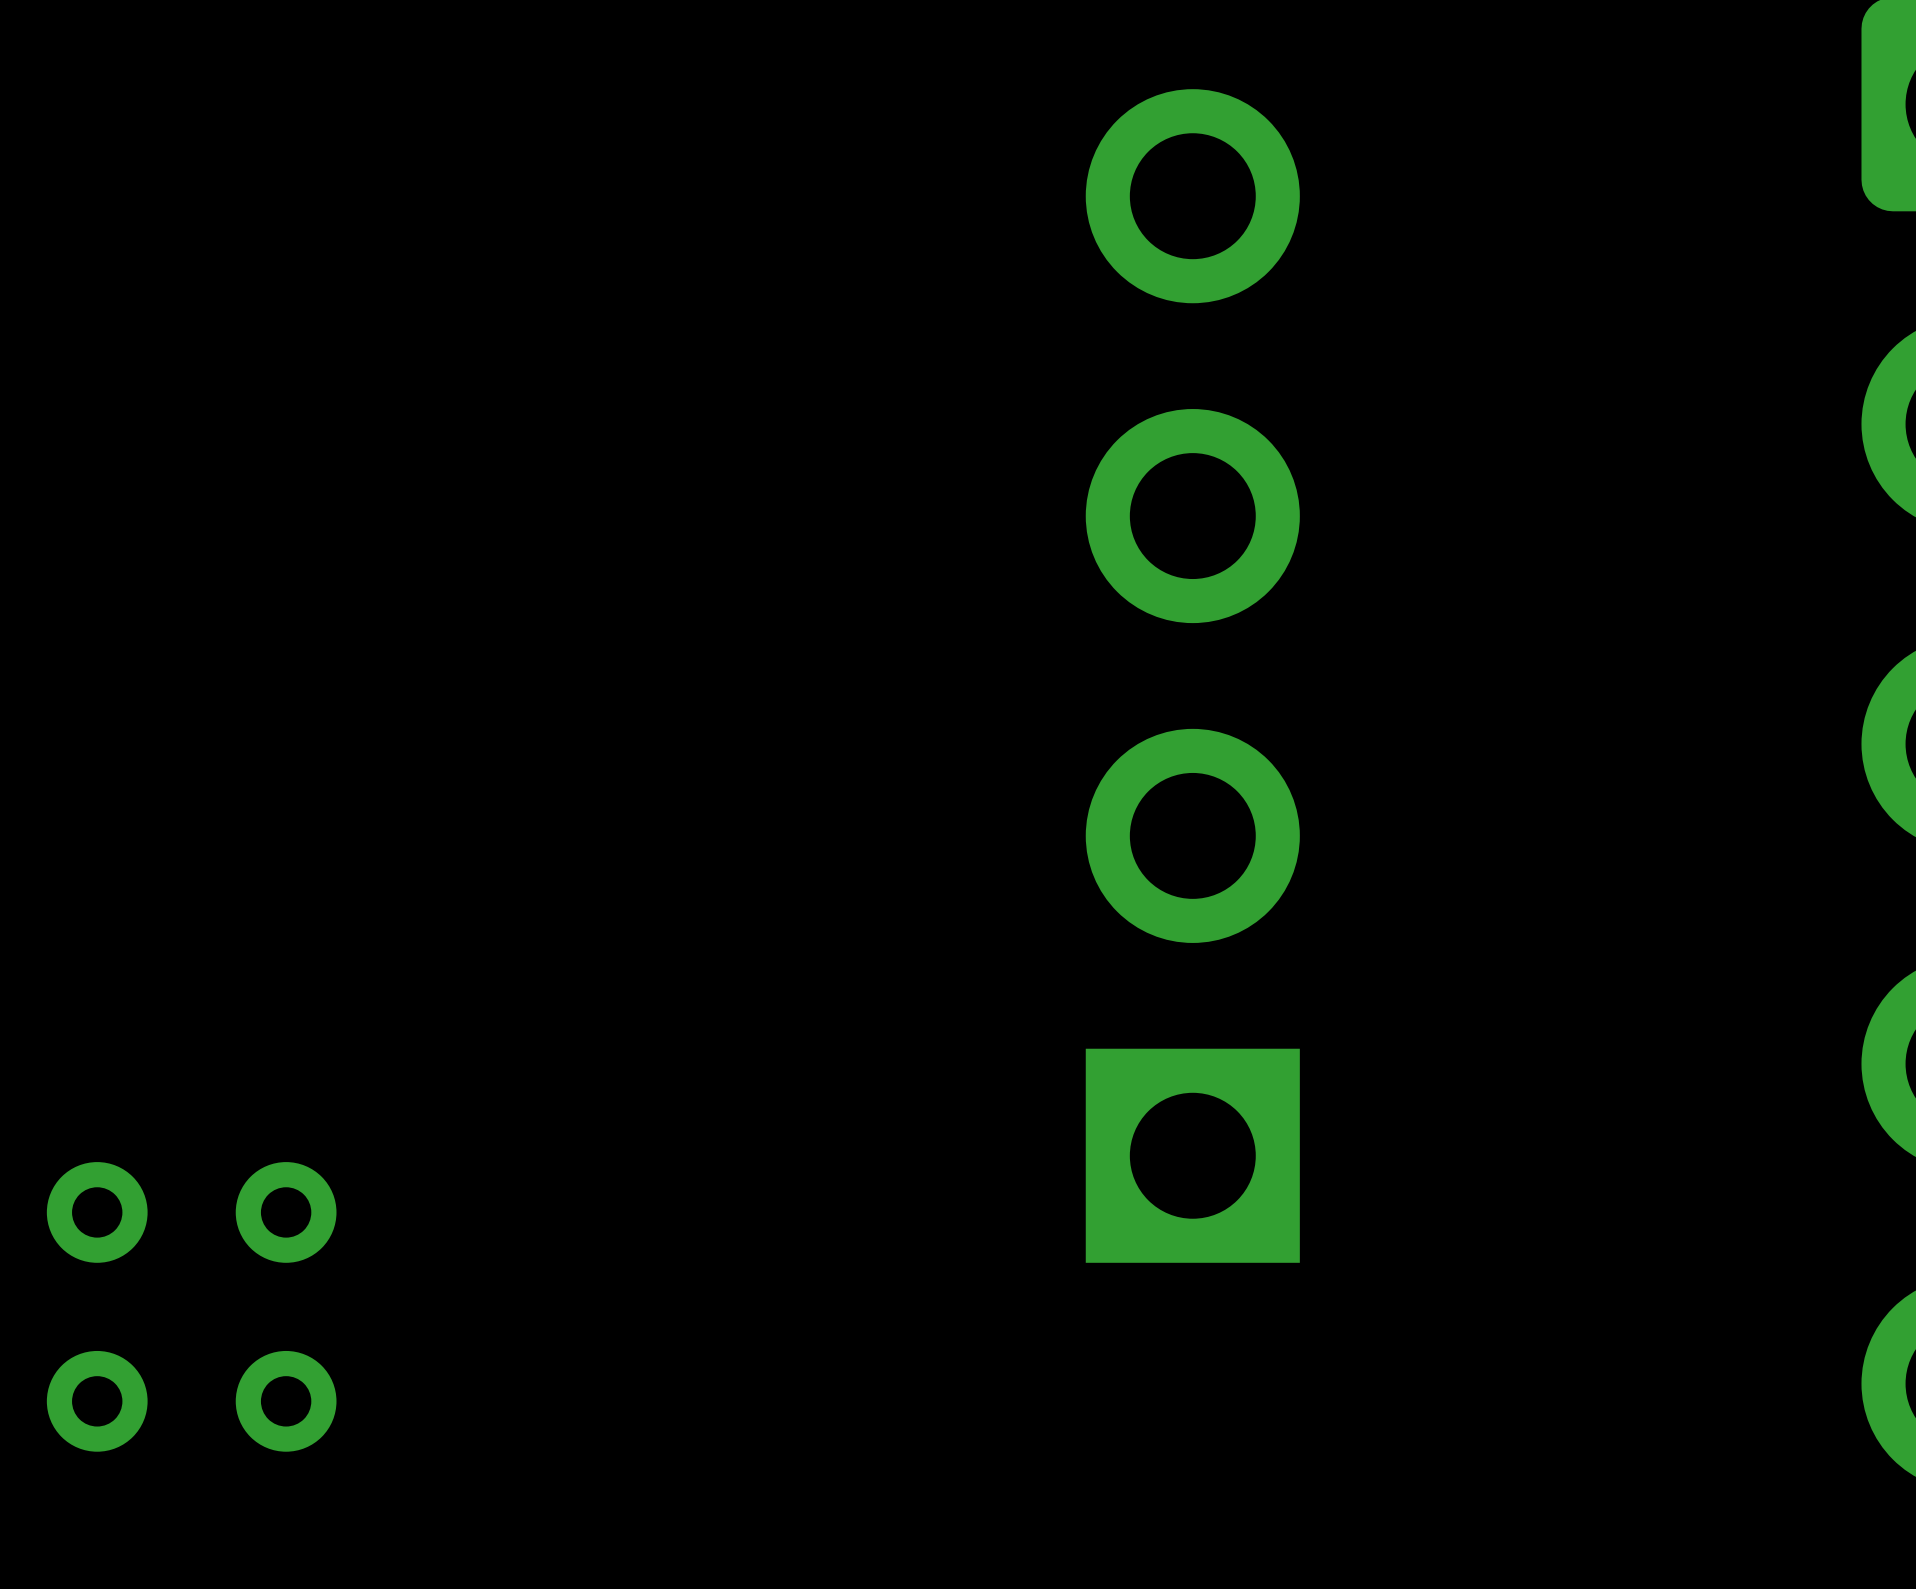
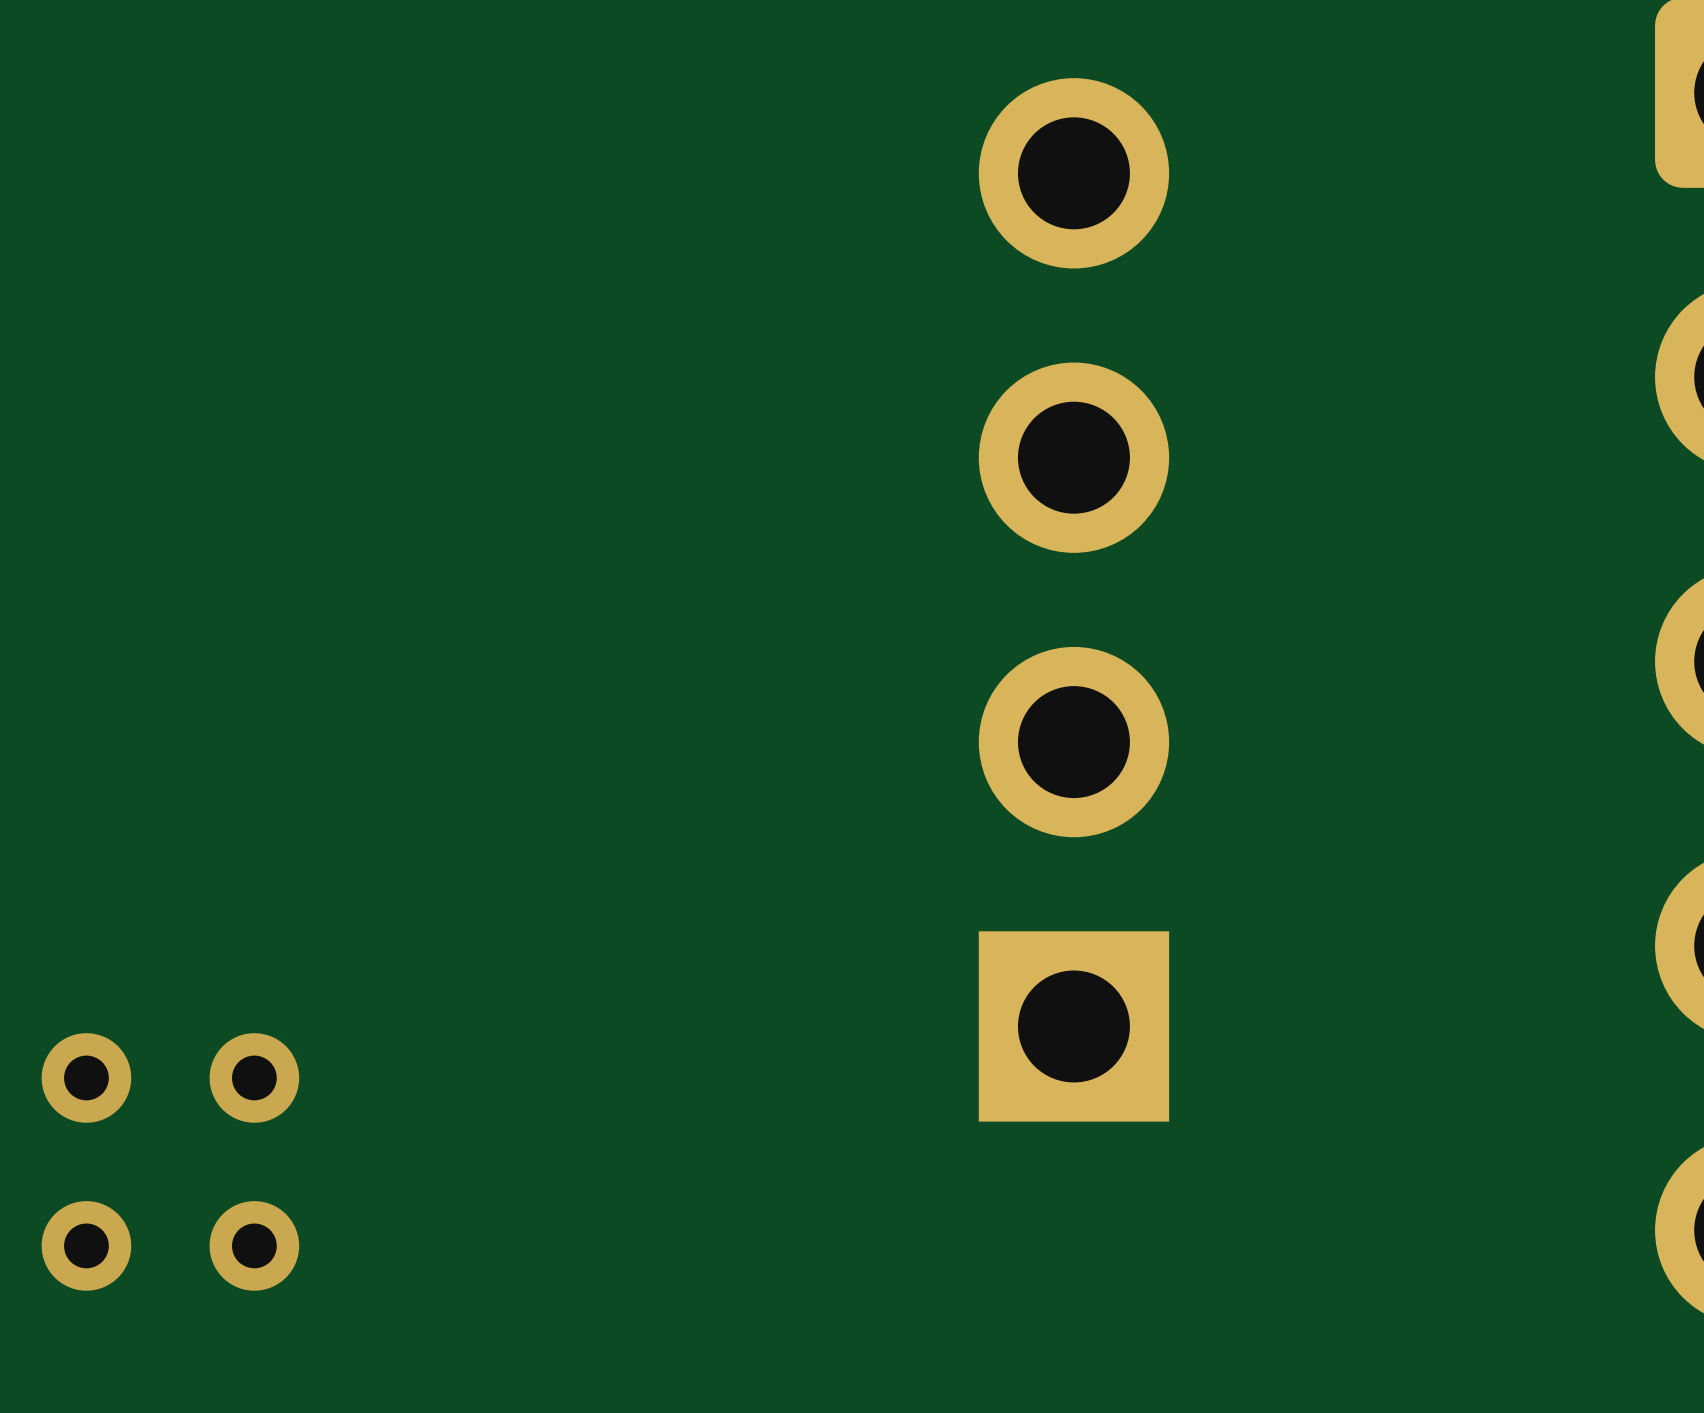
part position: (1192, 675) -> (1073, 599)

